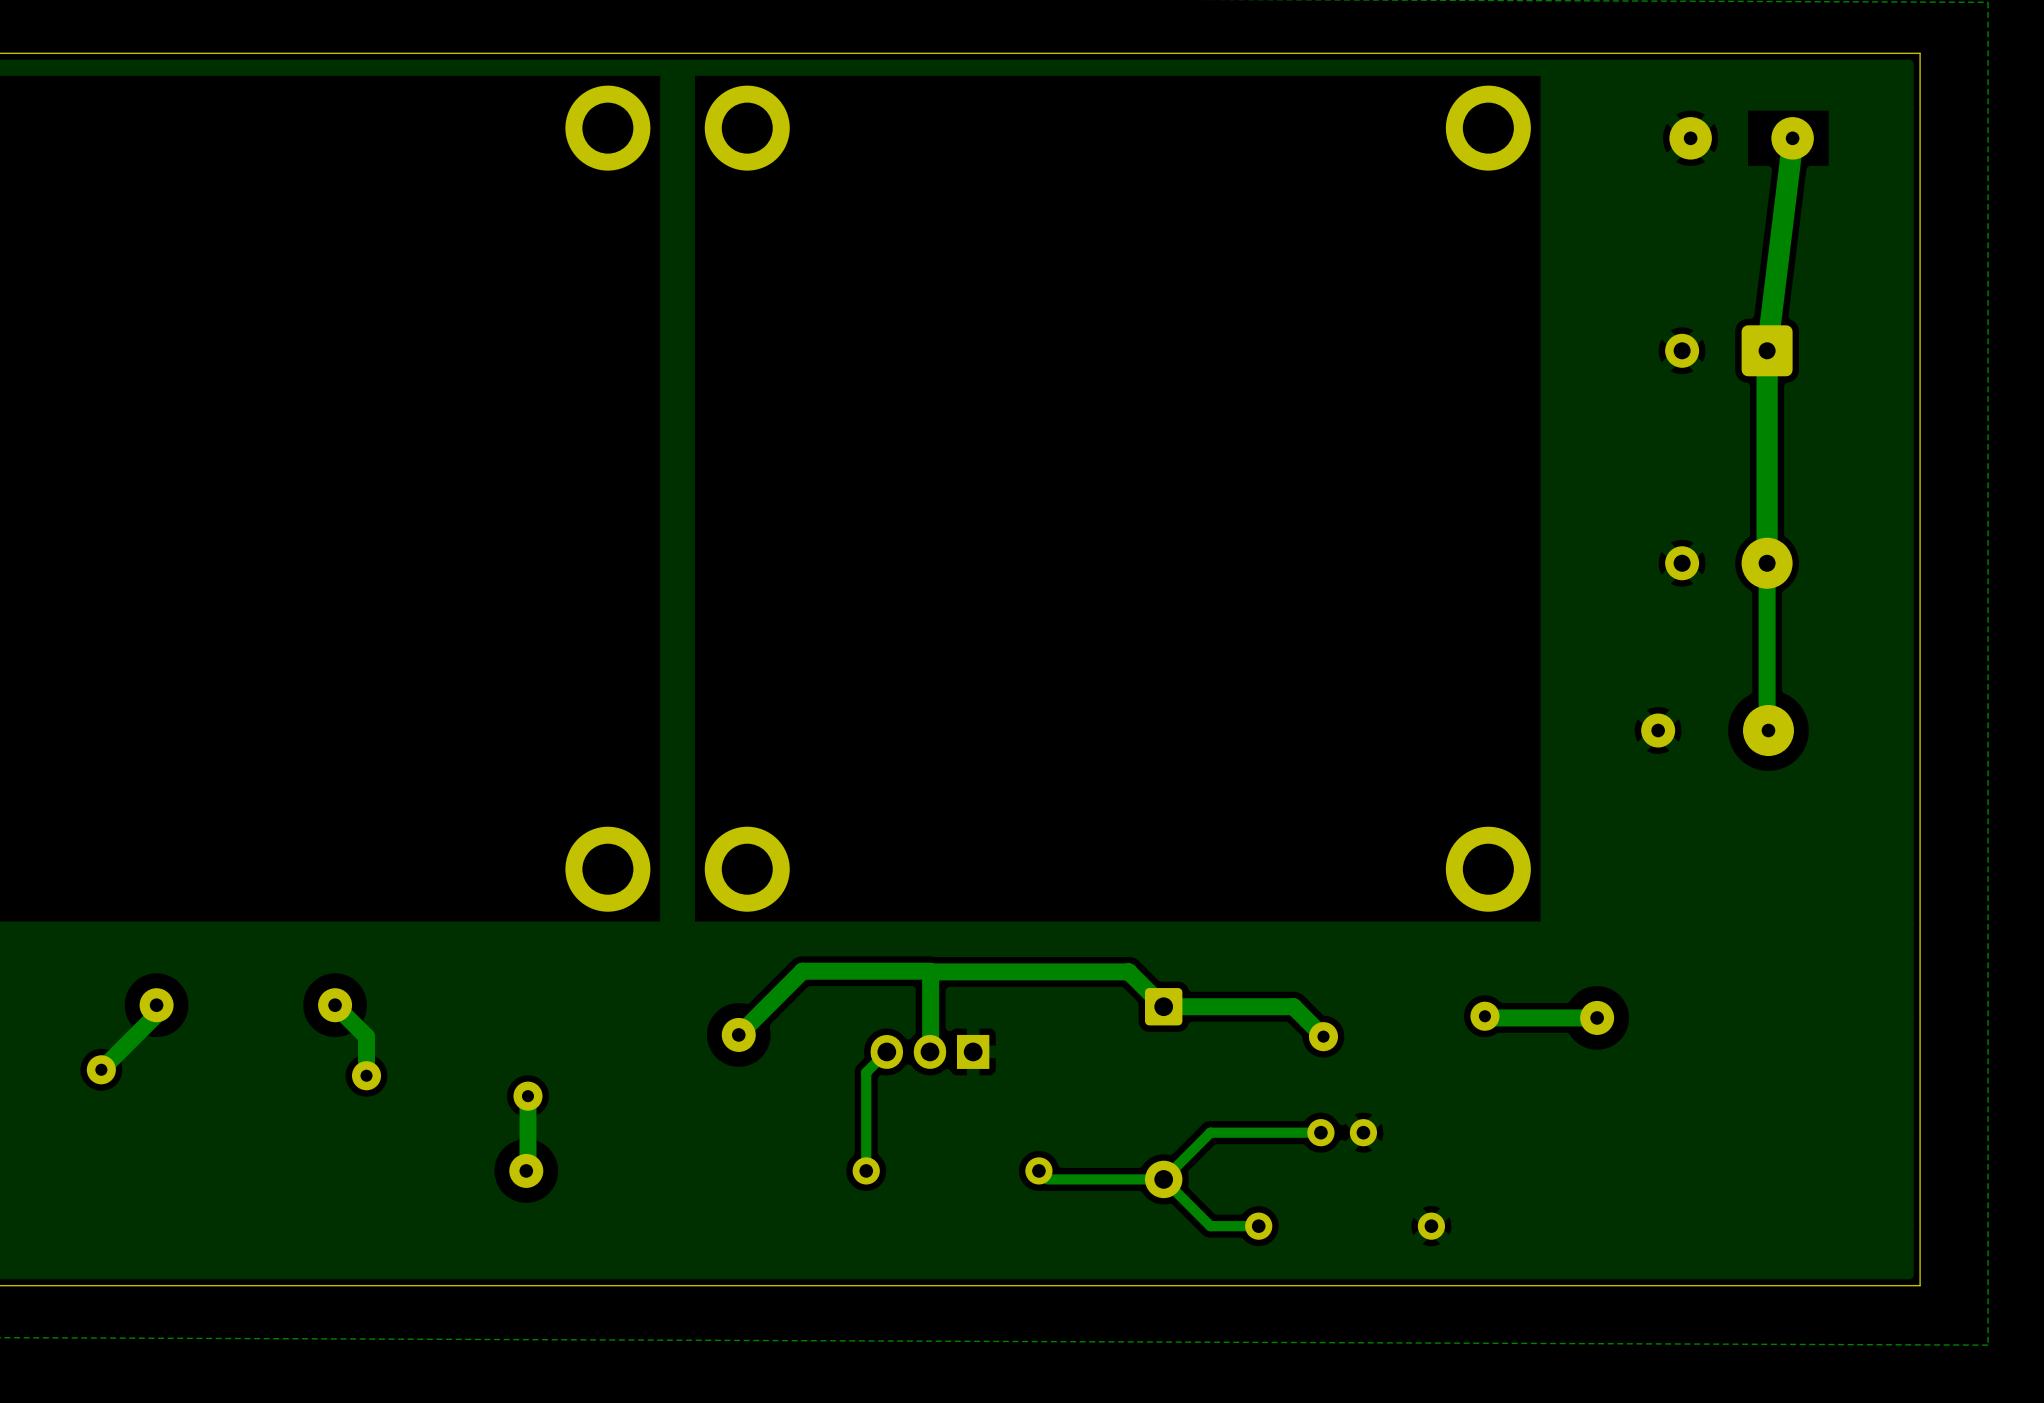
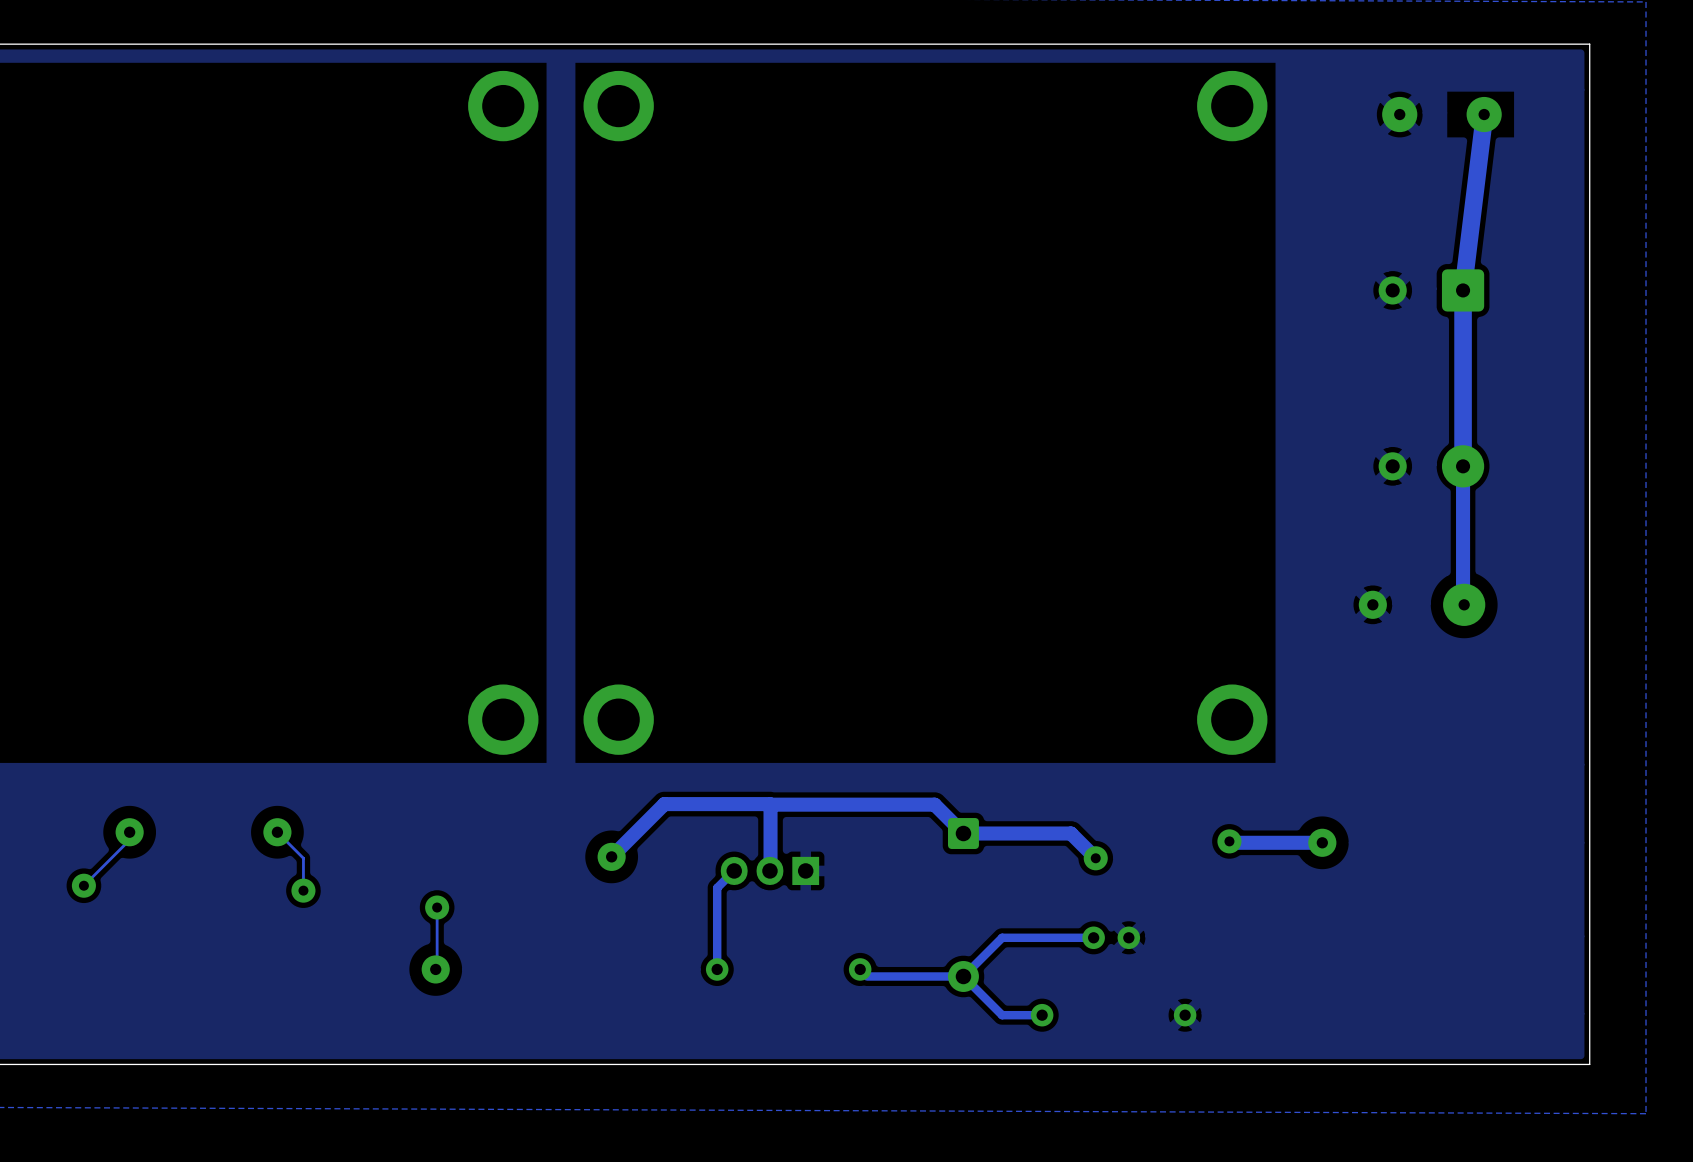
track width: thick (335, 1005) (366, 1036) (366, 1075) -> thin (277, 832) (303, 858) (303, 890)
track width: thick (156, 1014) (101, 1069) -> thin (129, 839) (83, 885)
track width: thick (527, 1096) (527, 1169) -> thin (437, 907) (437, 968)

